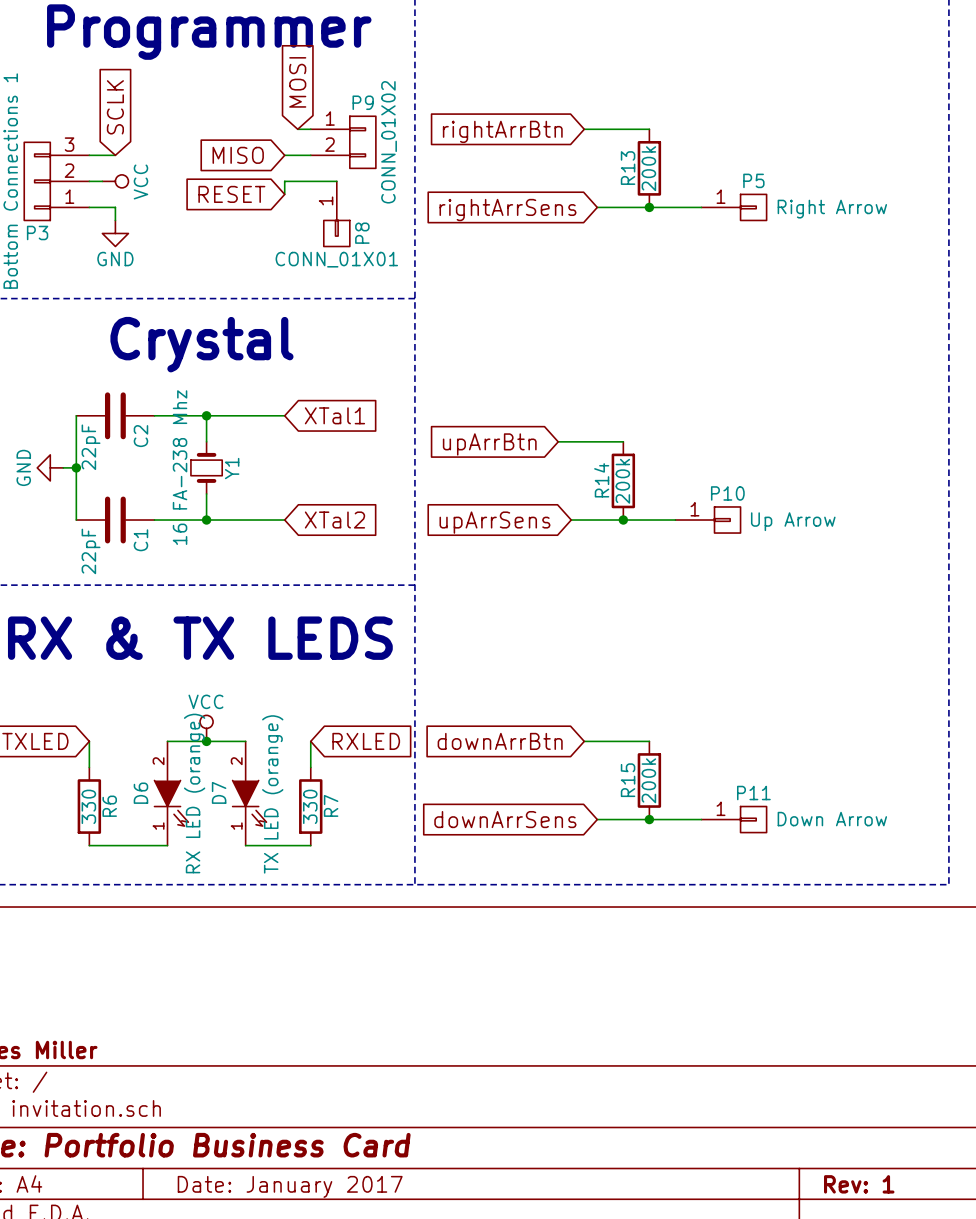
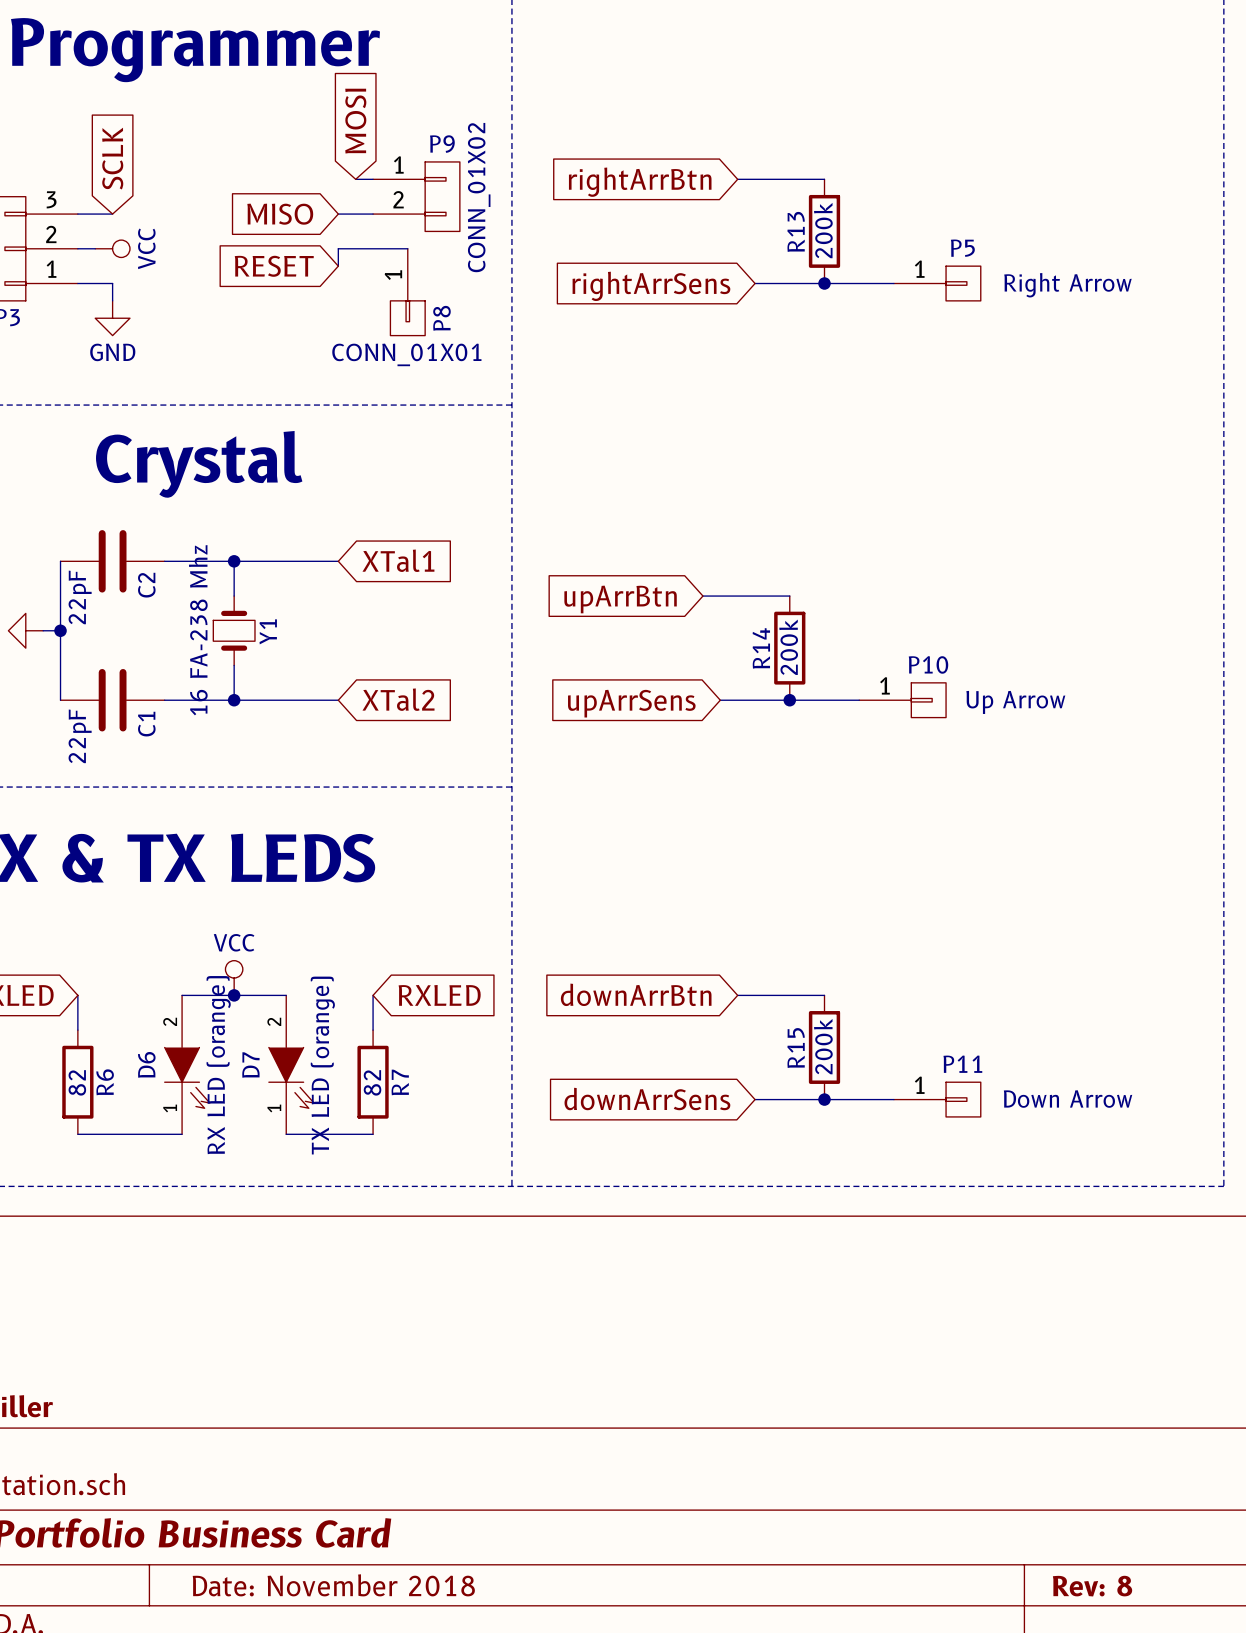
R6 value: 330 (88, 806) -> 82 (77, 1082)
R7 value: 330 (310, 806) -> 82 (372, 1082)
title block: Rev: 1 (859, 1184) -> Rev: 8 (1092, 1586)
title block: Date: January 2017 (290, 1186) -> Date: November 2018 (333, 1585)

